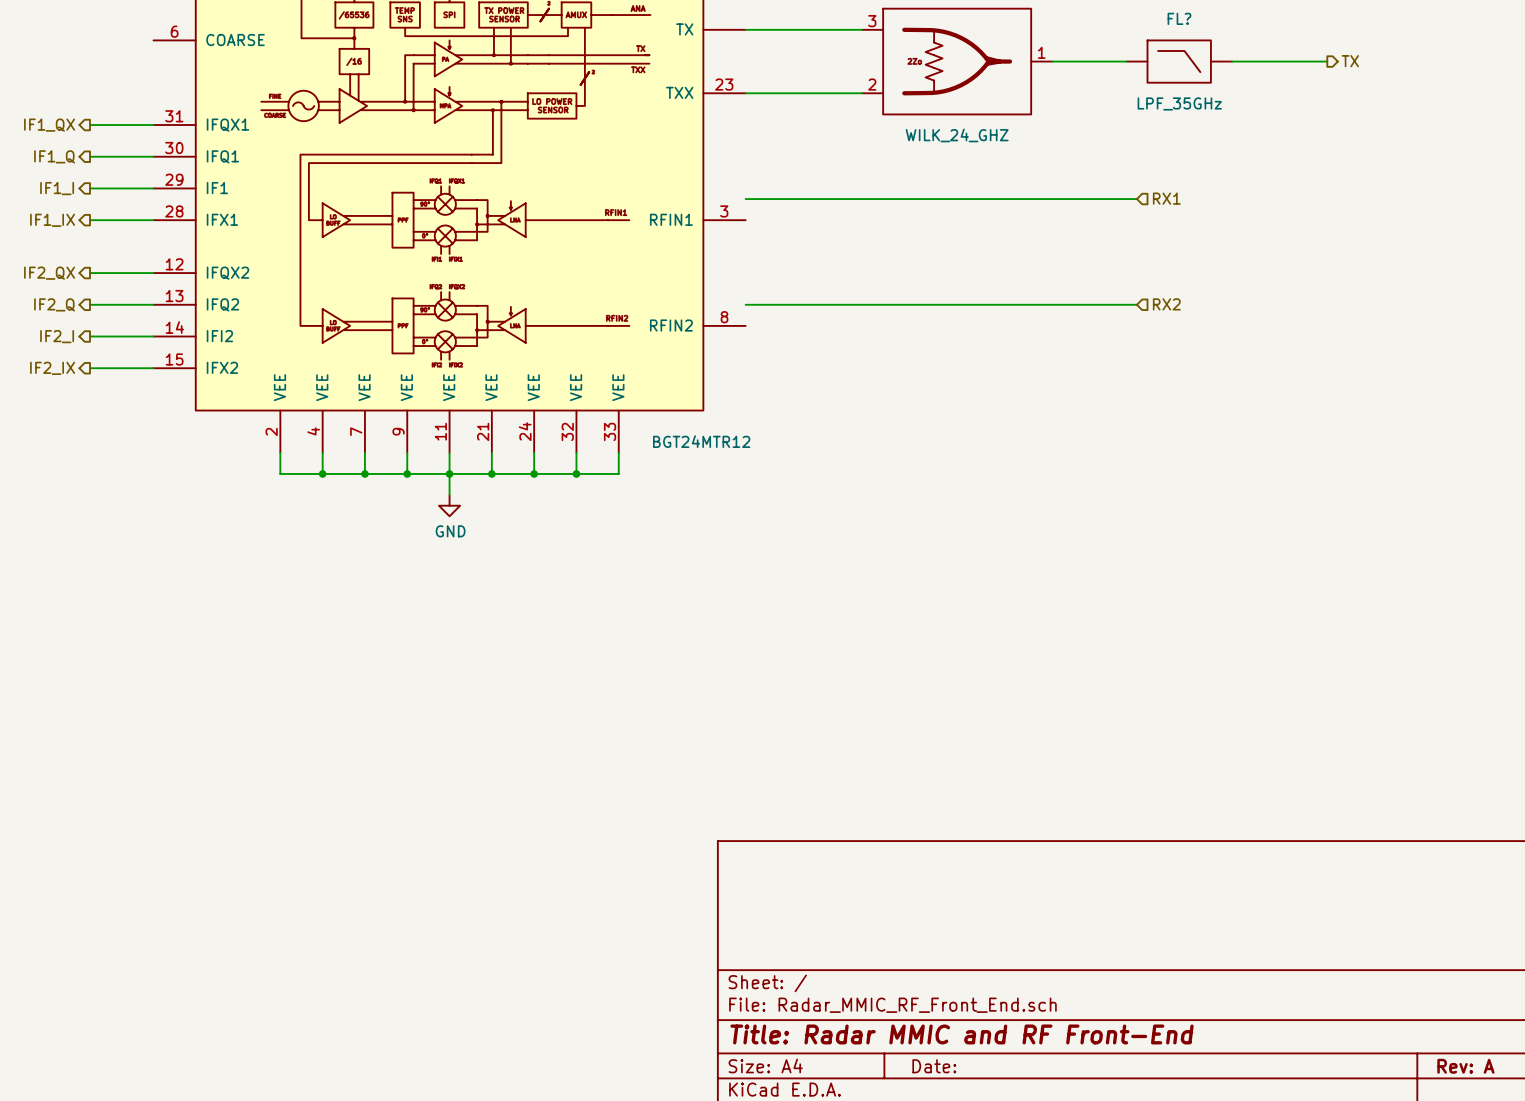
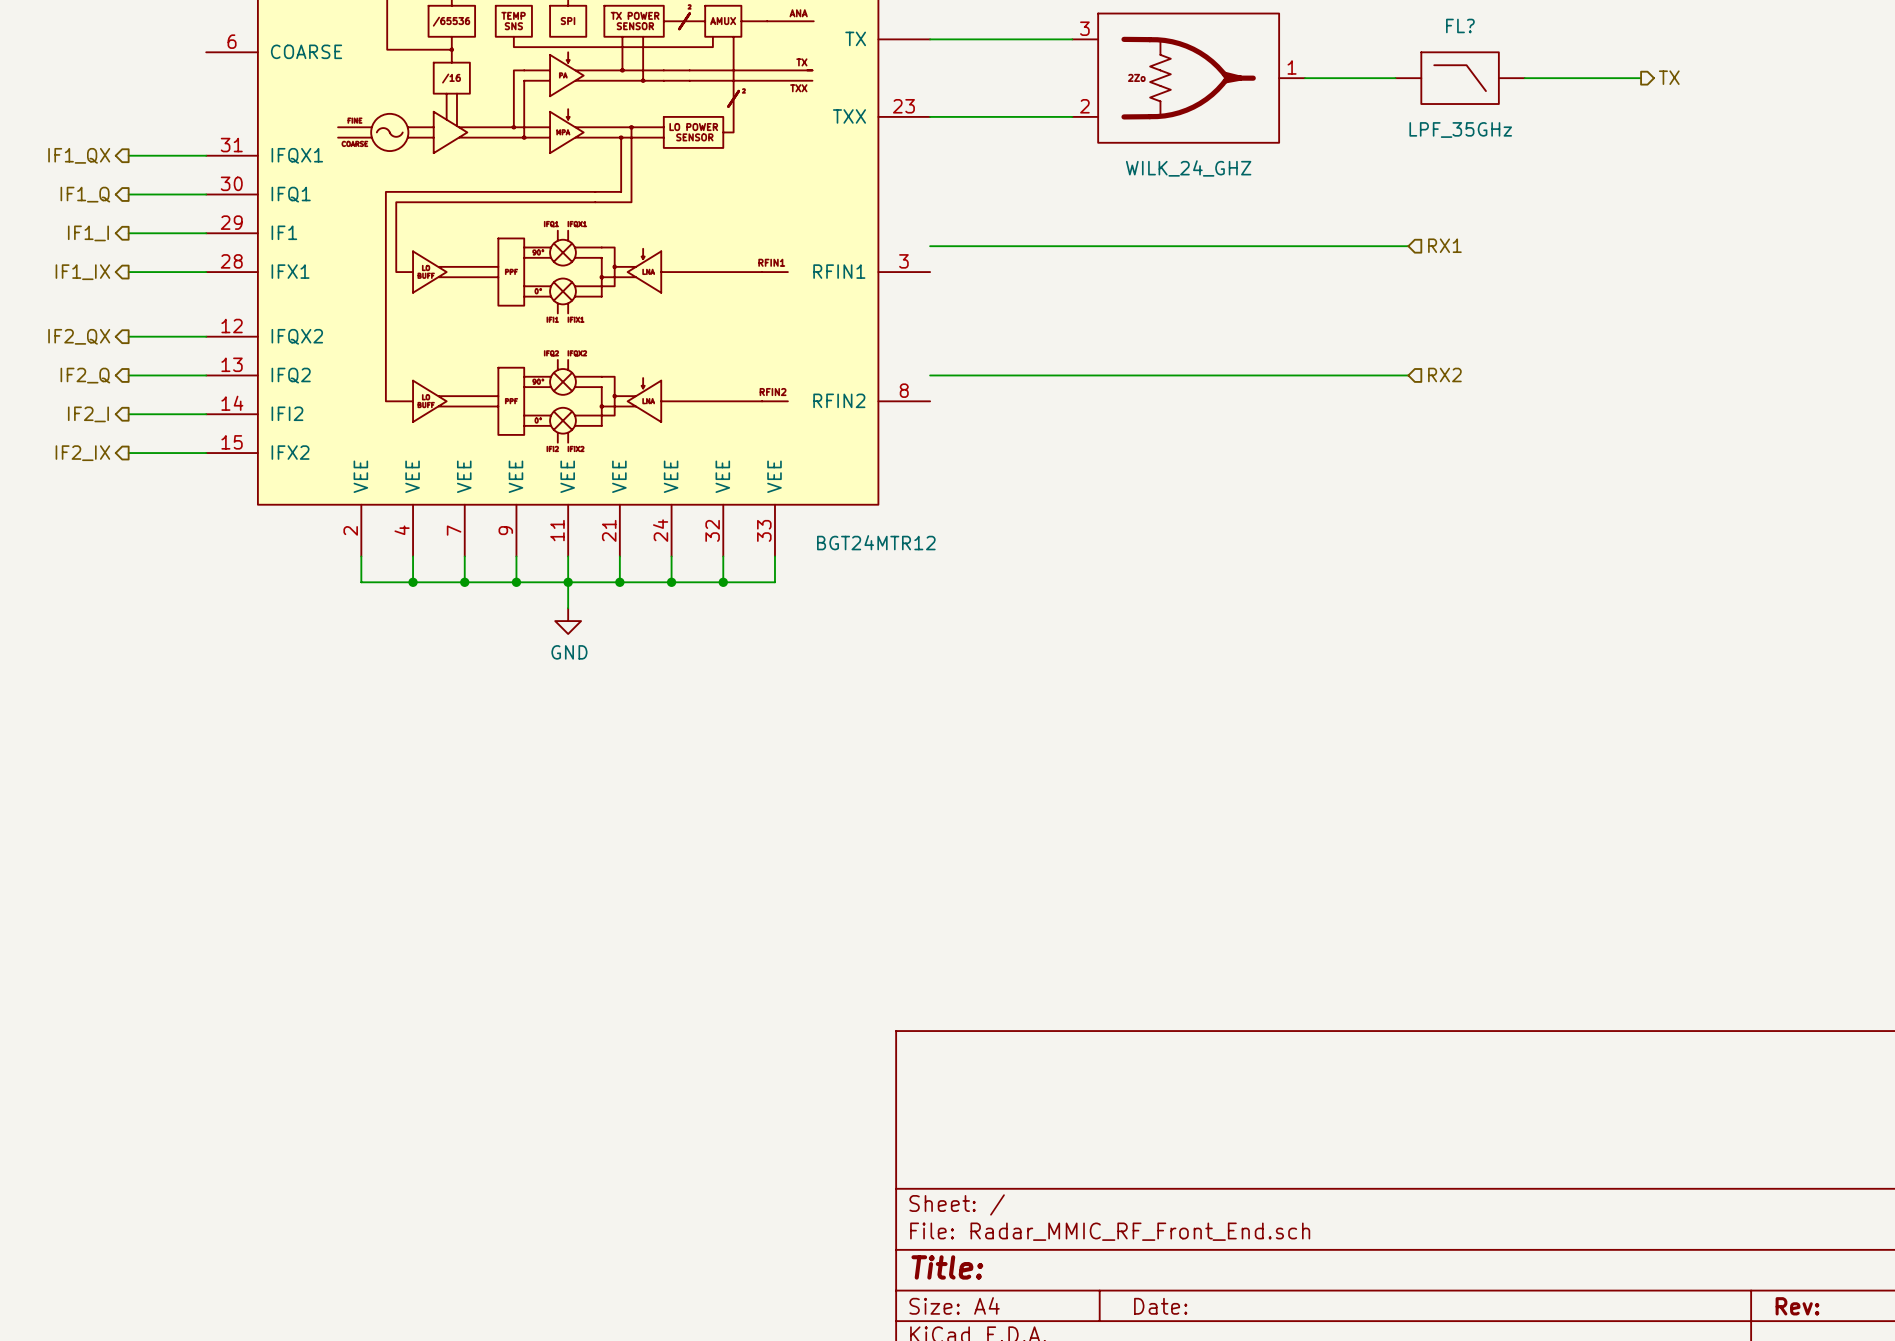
title block: Title: Radar MMIC and RF Front-End (962, 1034) -> Title: (947, 1267)
title block: Rev: A (1465, 1066) -> Rev: (1797, 1306)

